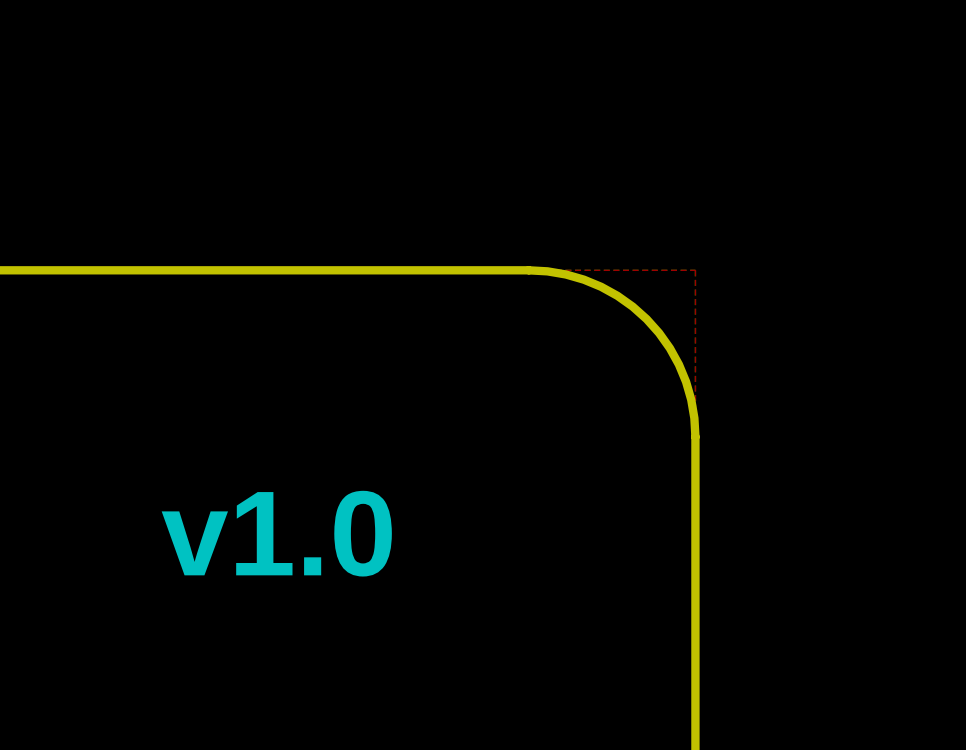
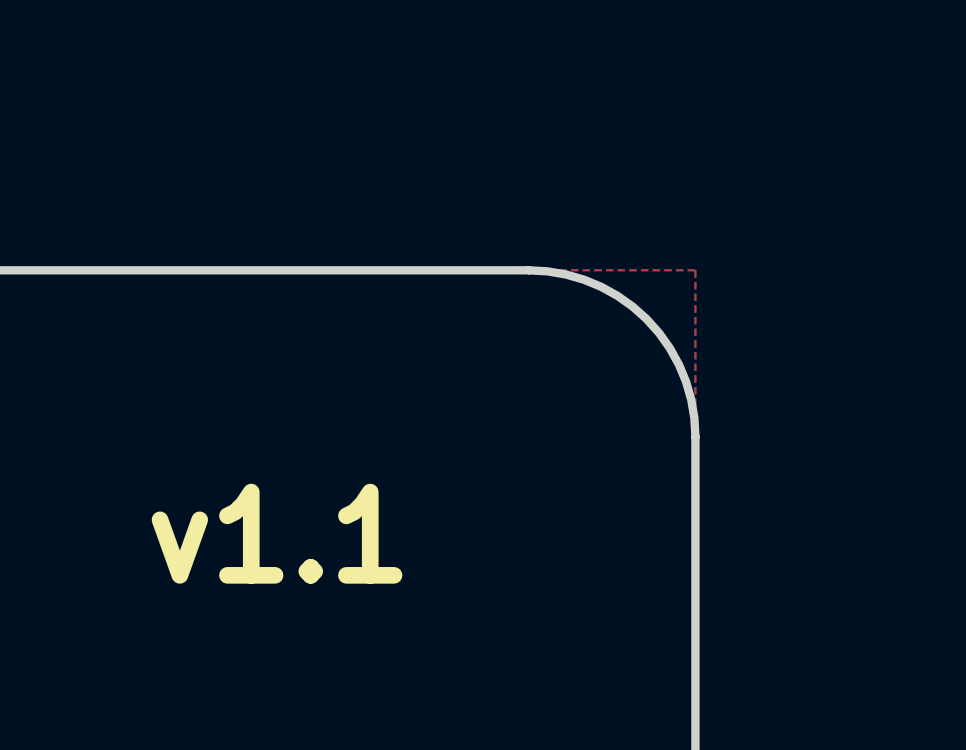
text: v1.0 (276, 533) -> v1.1 (277, 533)

